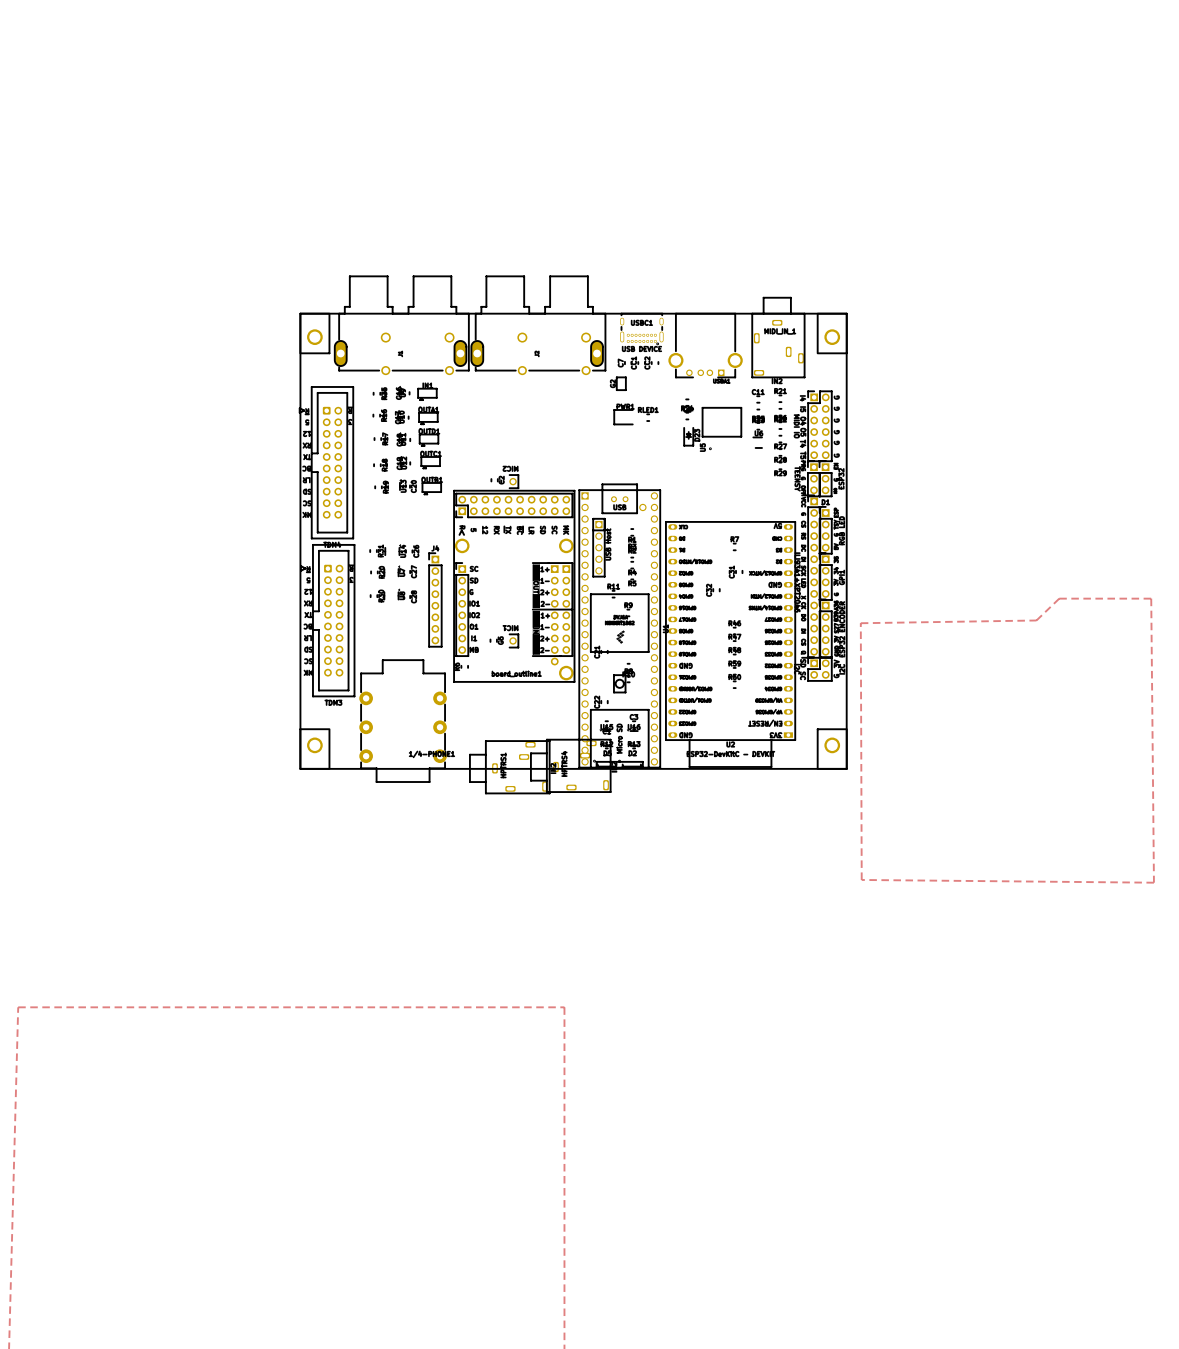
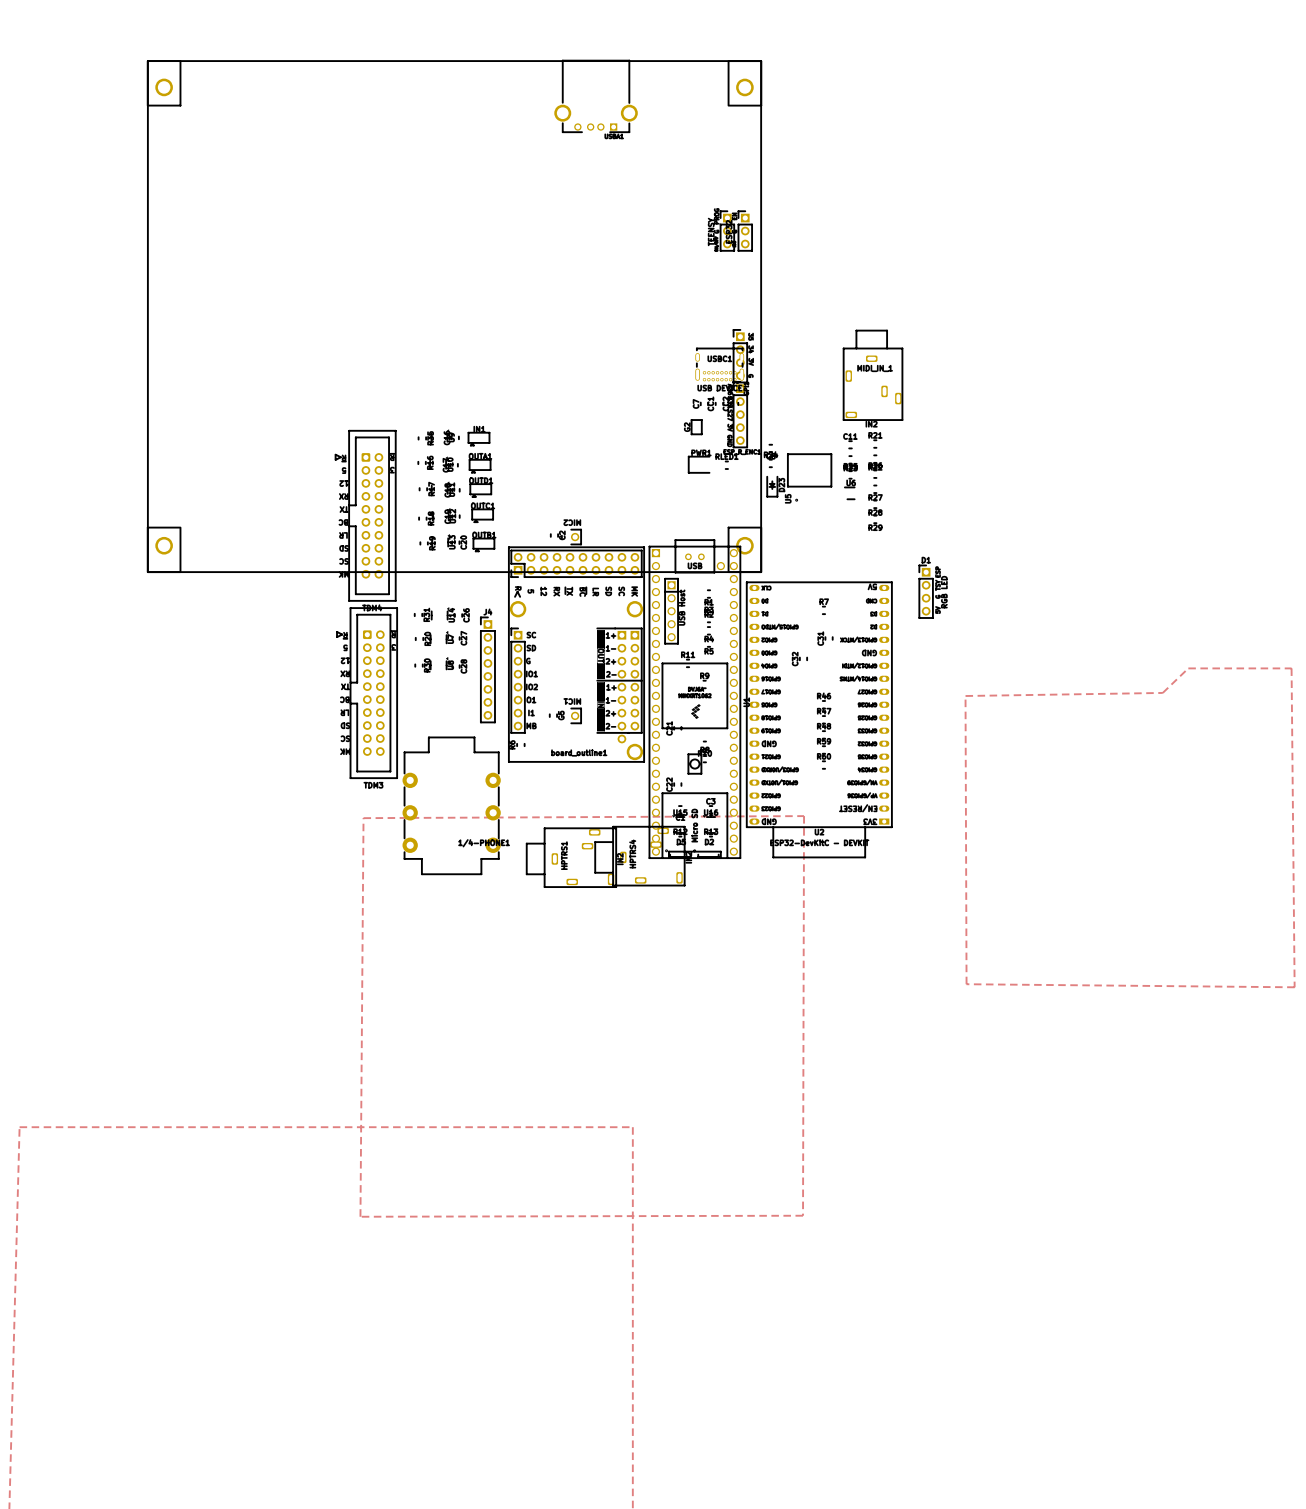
part: none -> (727, 231)
part: none -> (745, 231)
part: none -> (454, 316)
part: none -> (740, 356)
part: (402, 325) -> none
part: (538, 325) -> none
part position: (705, 347) -> (596, 98)
part: none -> (740, 414)
part: (819, 426) -> none
part: (814, 478) -> none
part: (825, 478) -> none
part: (573, 541) -> none
part: (811, 576) -> none
part: (825, 576) -> none
part: (825, 628) -> none
part: (819, 669) -> none
zone outline: none -> (804, 816) (363, 818) (360, 1216) (803, 1215) (804, 816)

